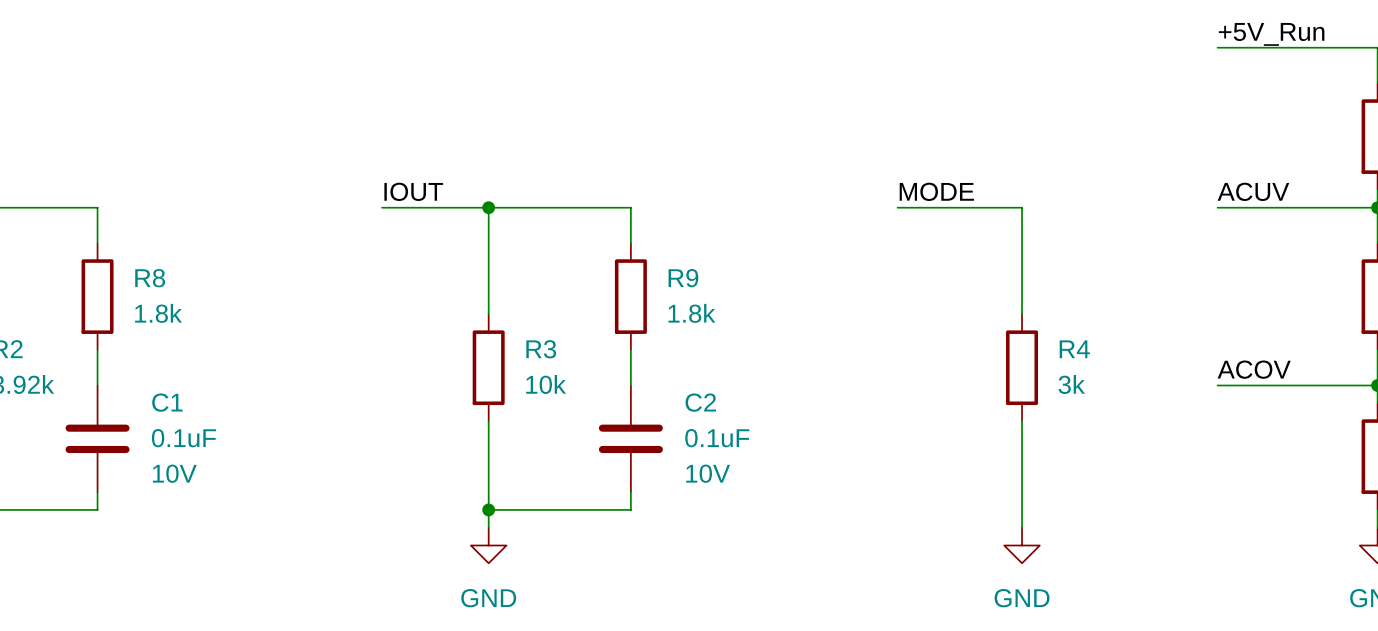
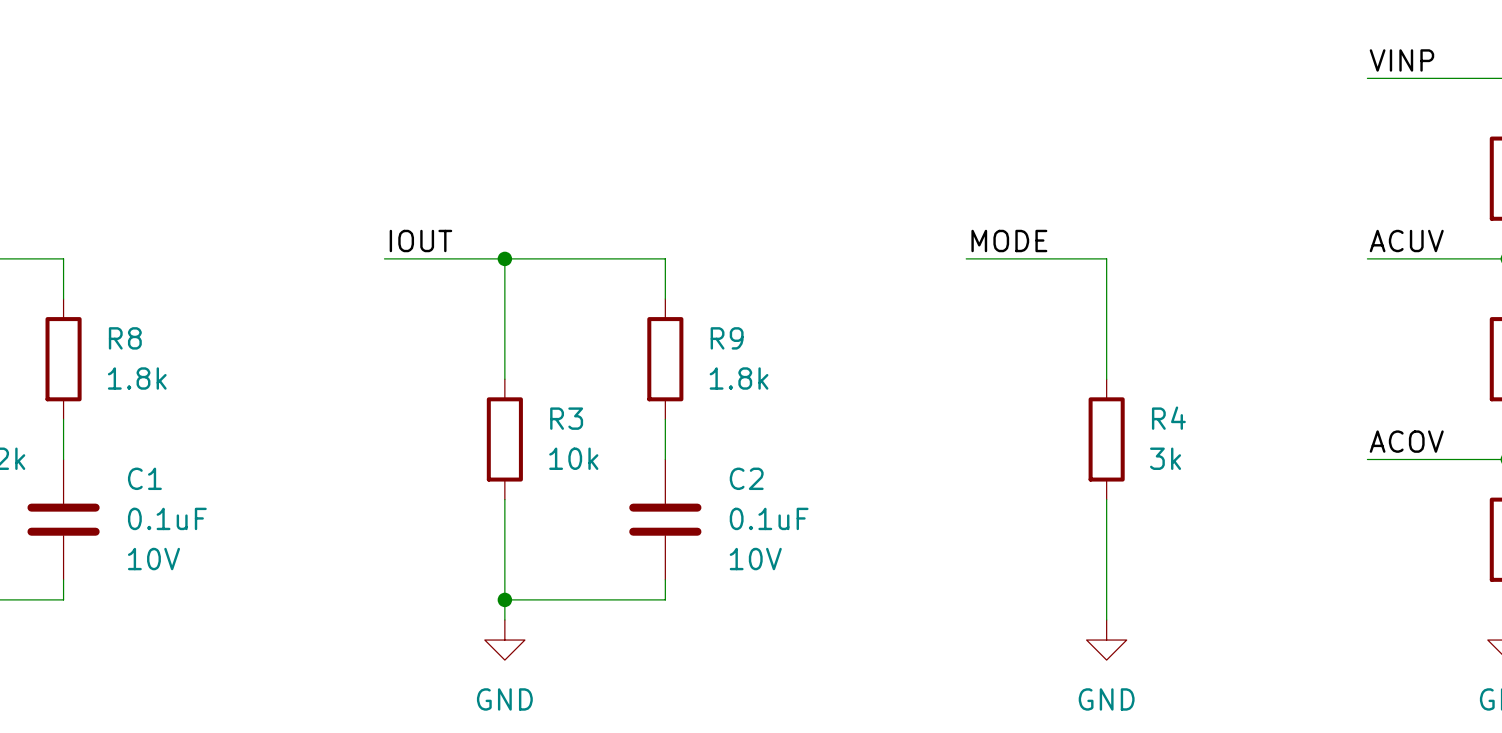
label: none -> VINP (1401, 60)
label: +5V_Run (1271, 34) -> none
wire: (1217, 47) (1253, 47) -> none
label position: ACUV (1253, 191) -> ACUV (1406, 241)
wire: (1217, 207) (1253, 207) -> none
label position: ACOV (1254, 369) -> ACOV (1406, 441)
wire: (1217, 385) (1253, 385) -> none

